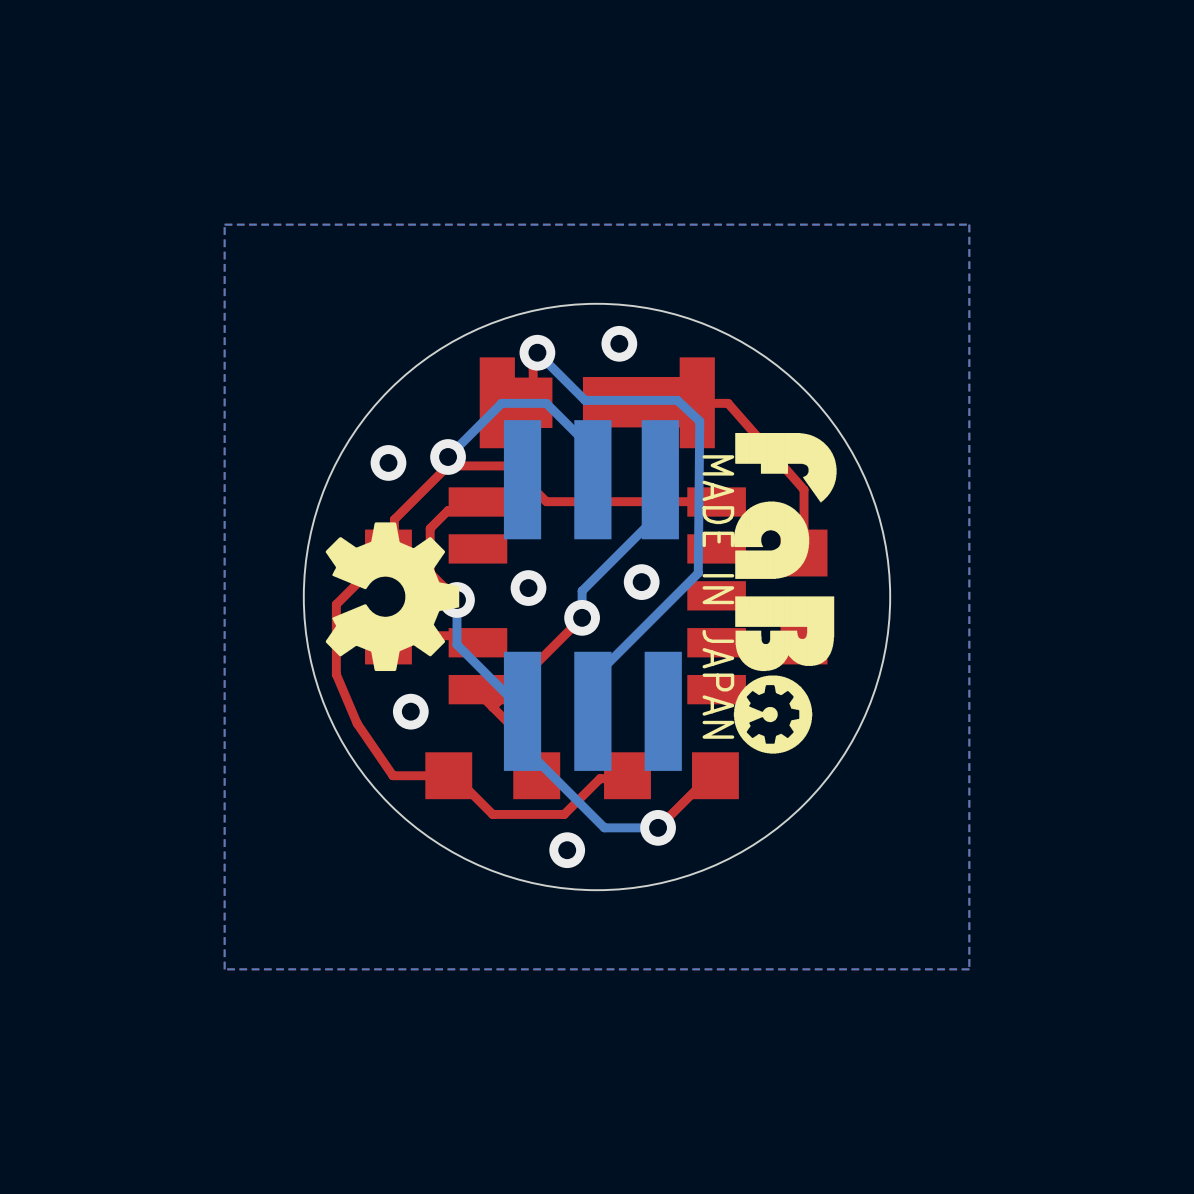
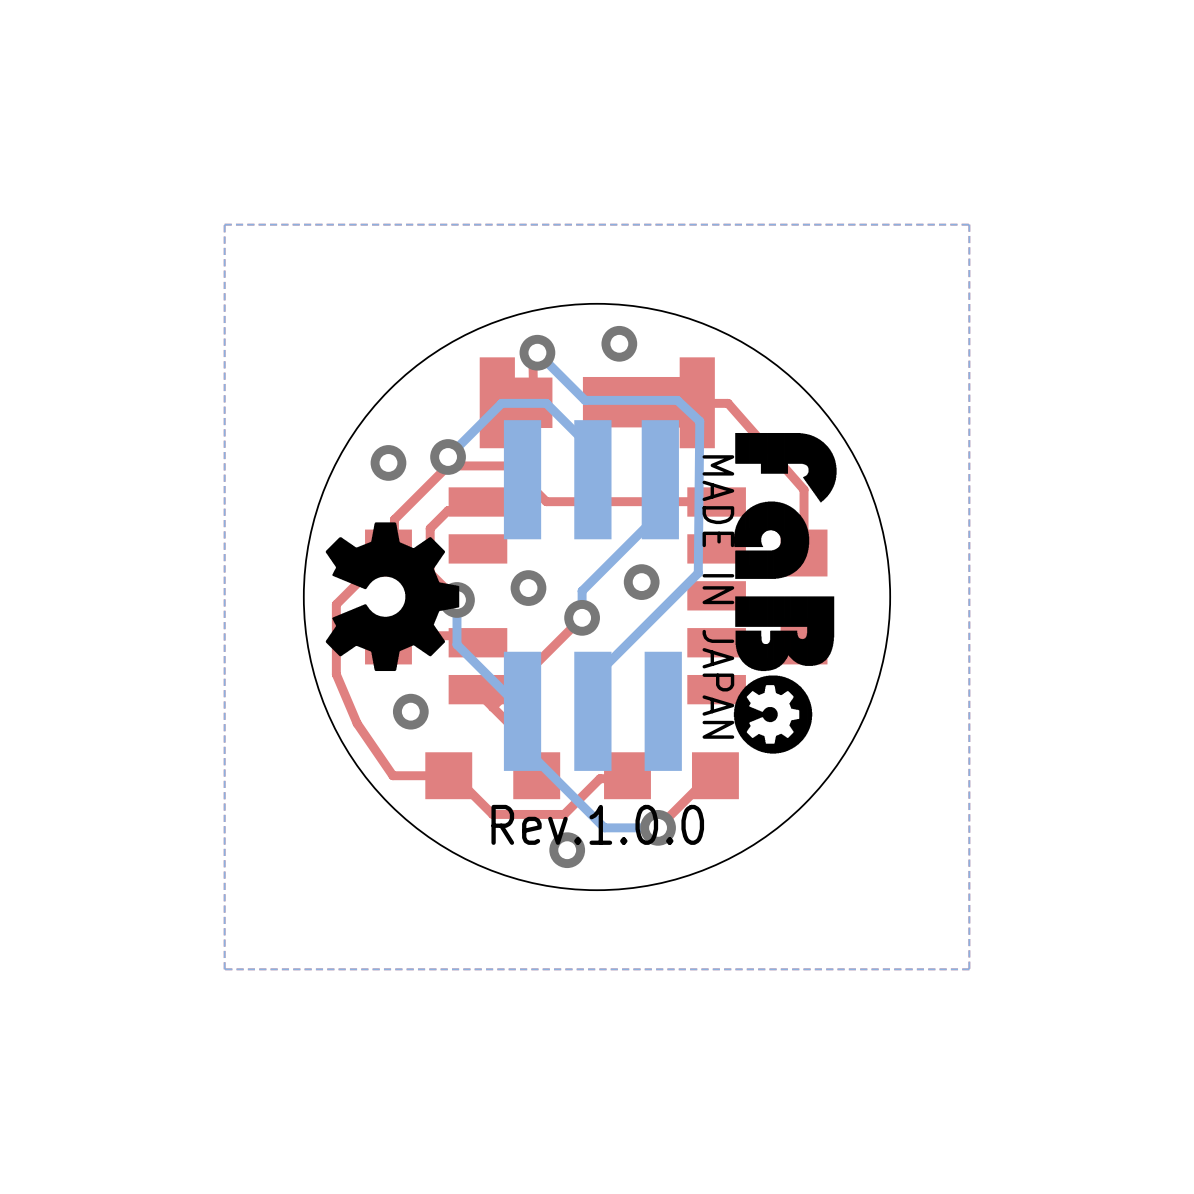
text: none -> Rev.1.0.0 (597, 824)

